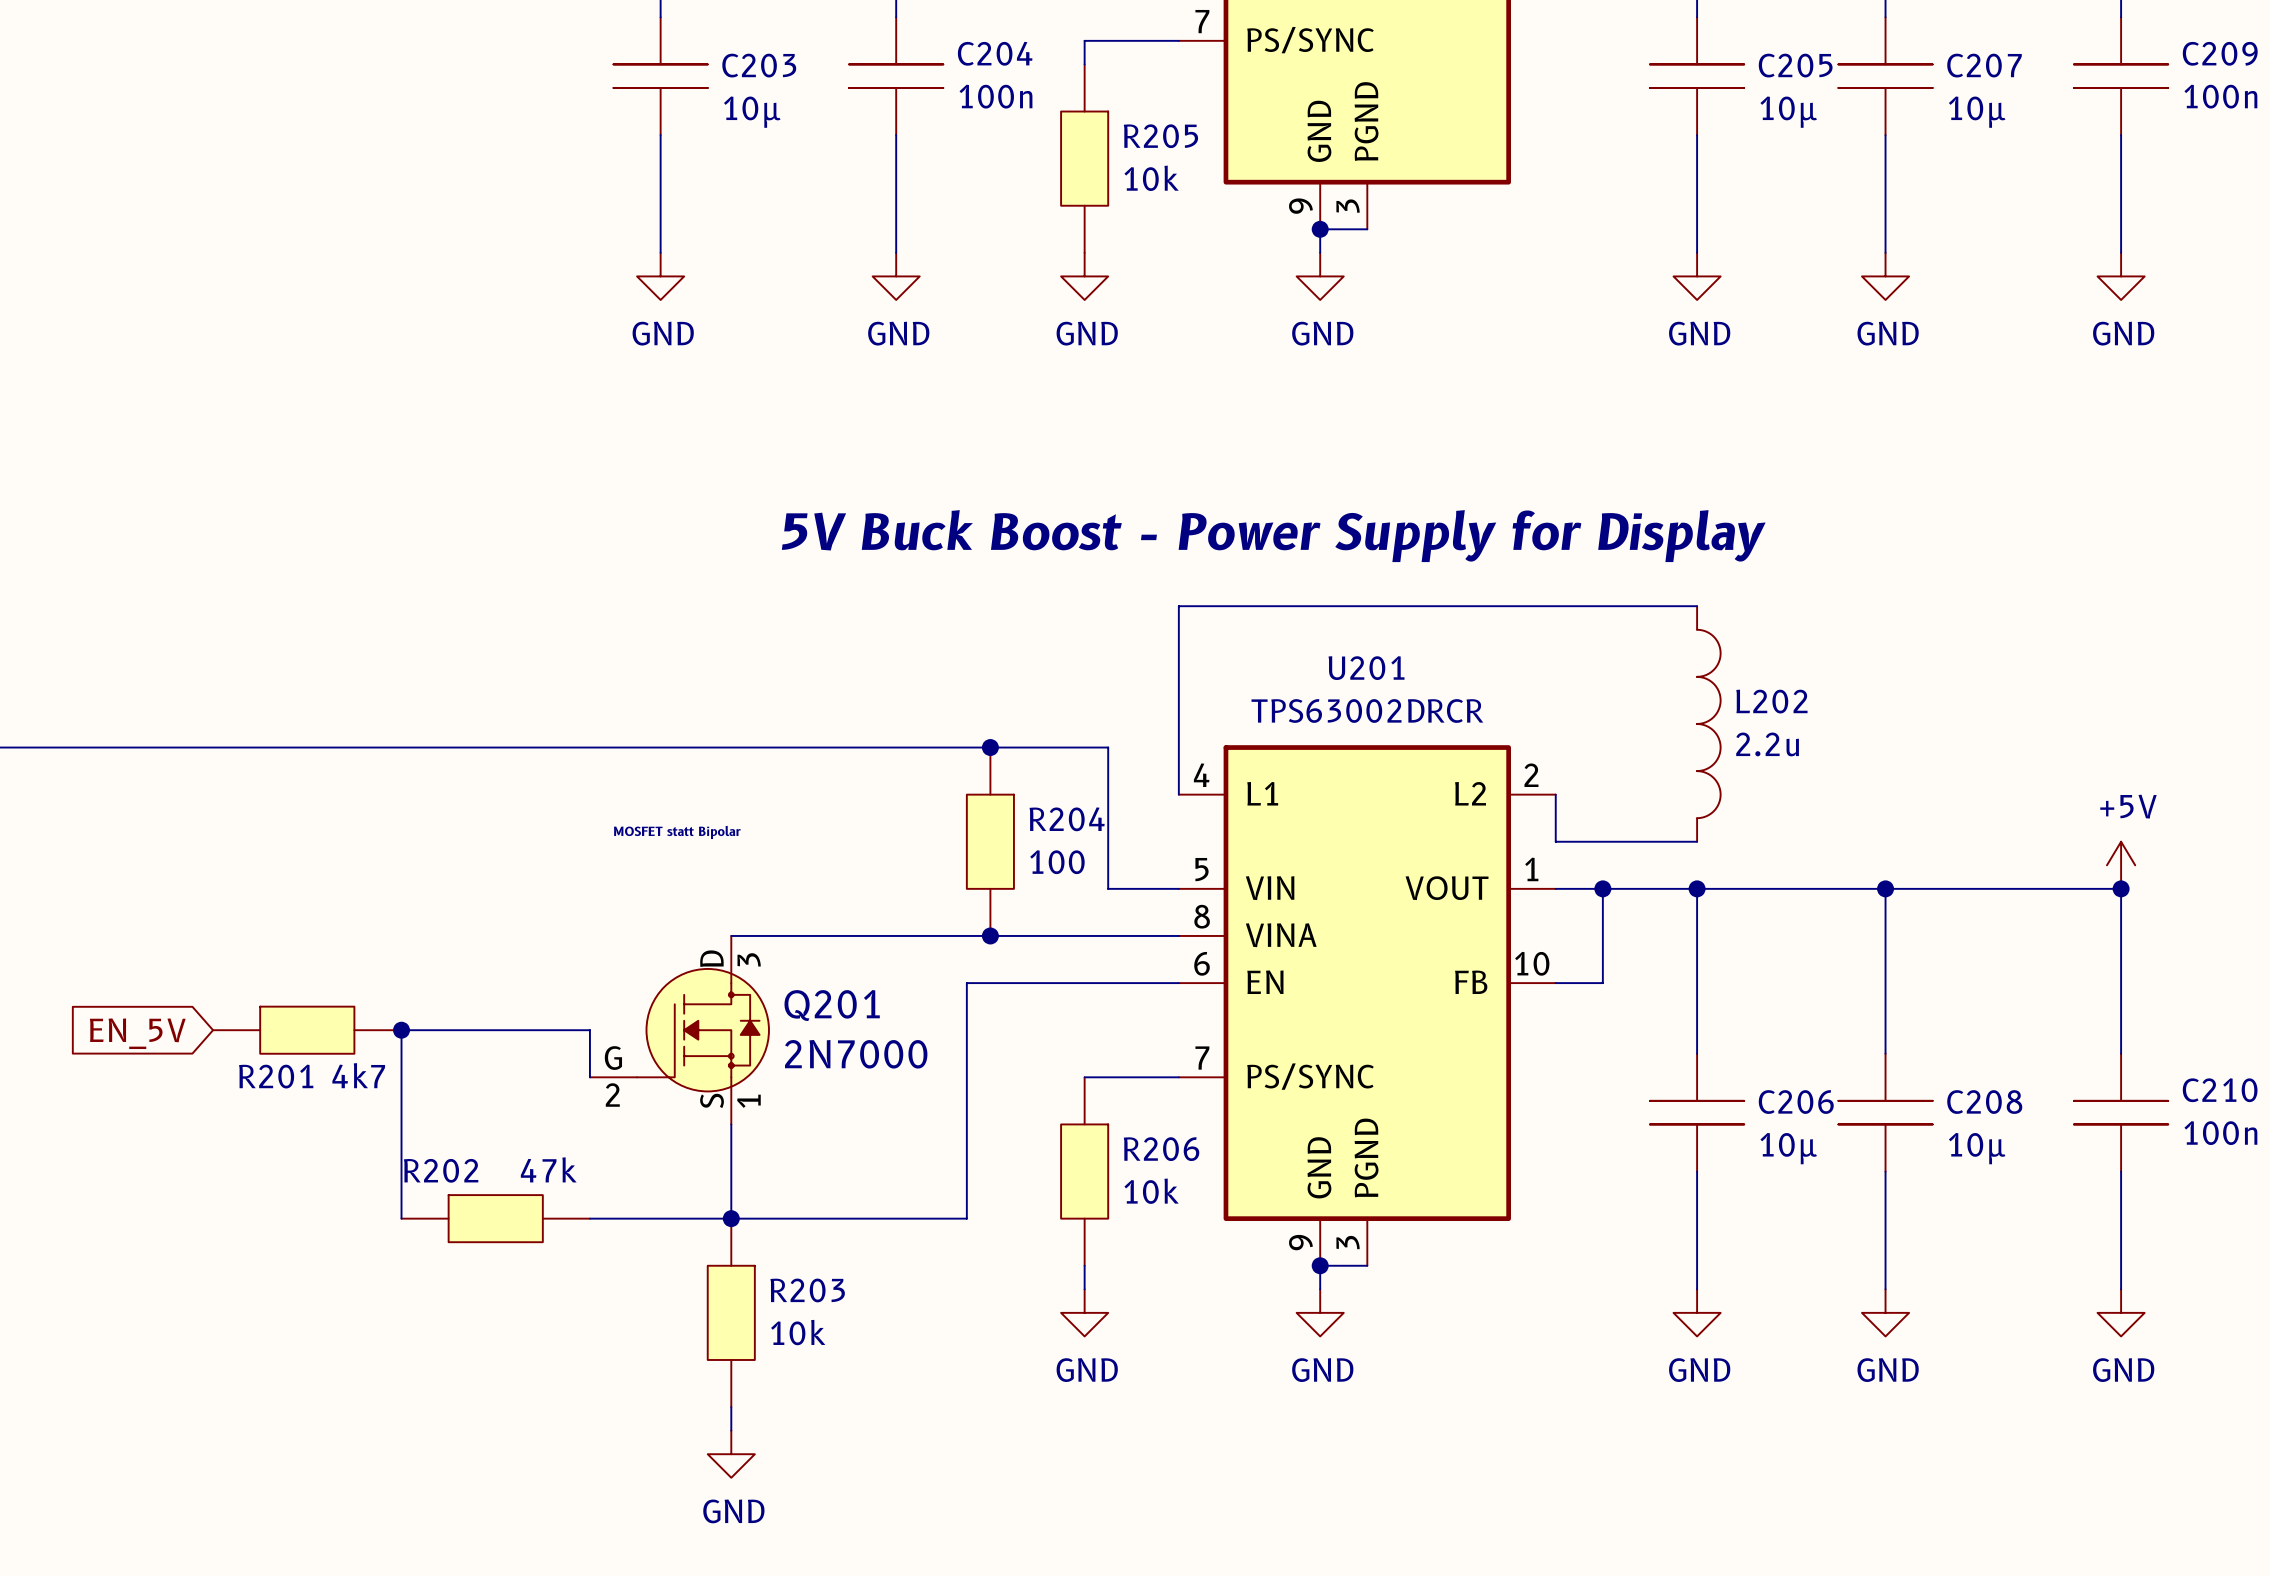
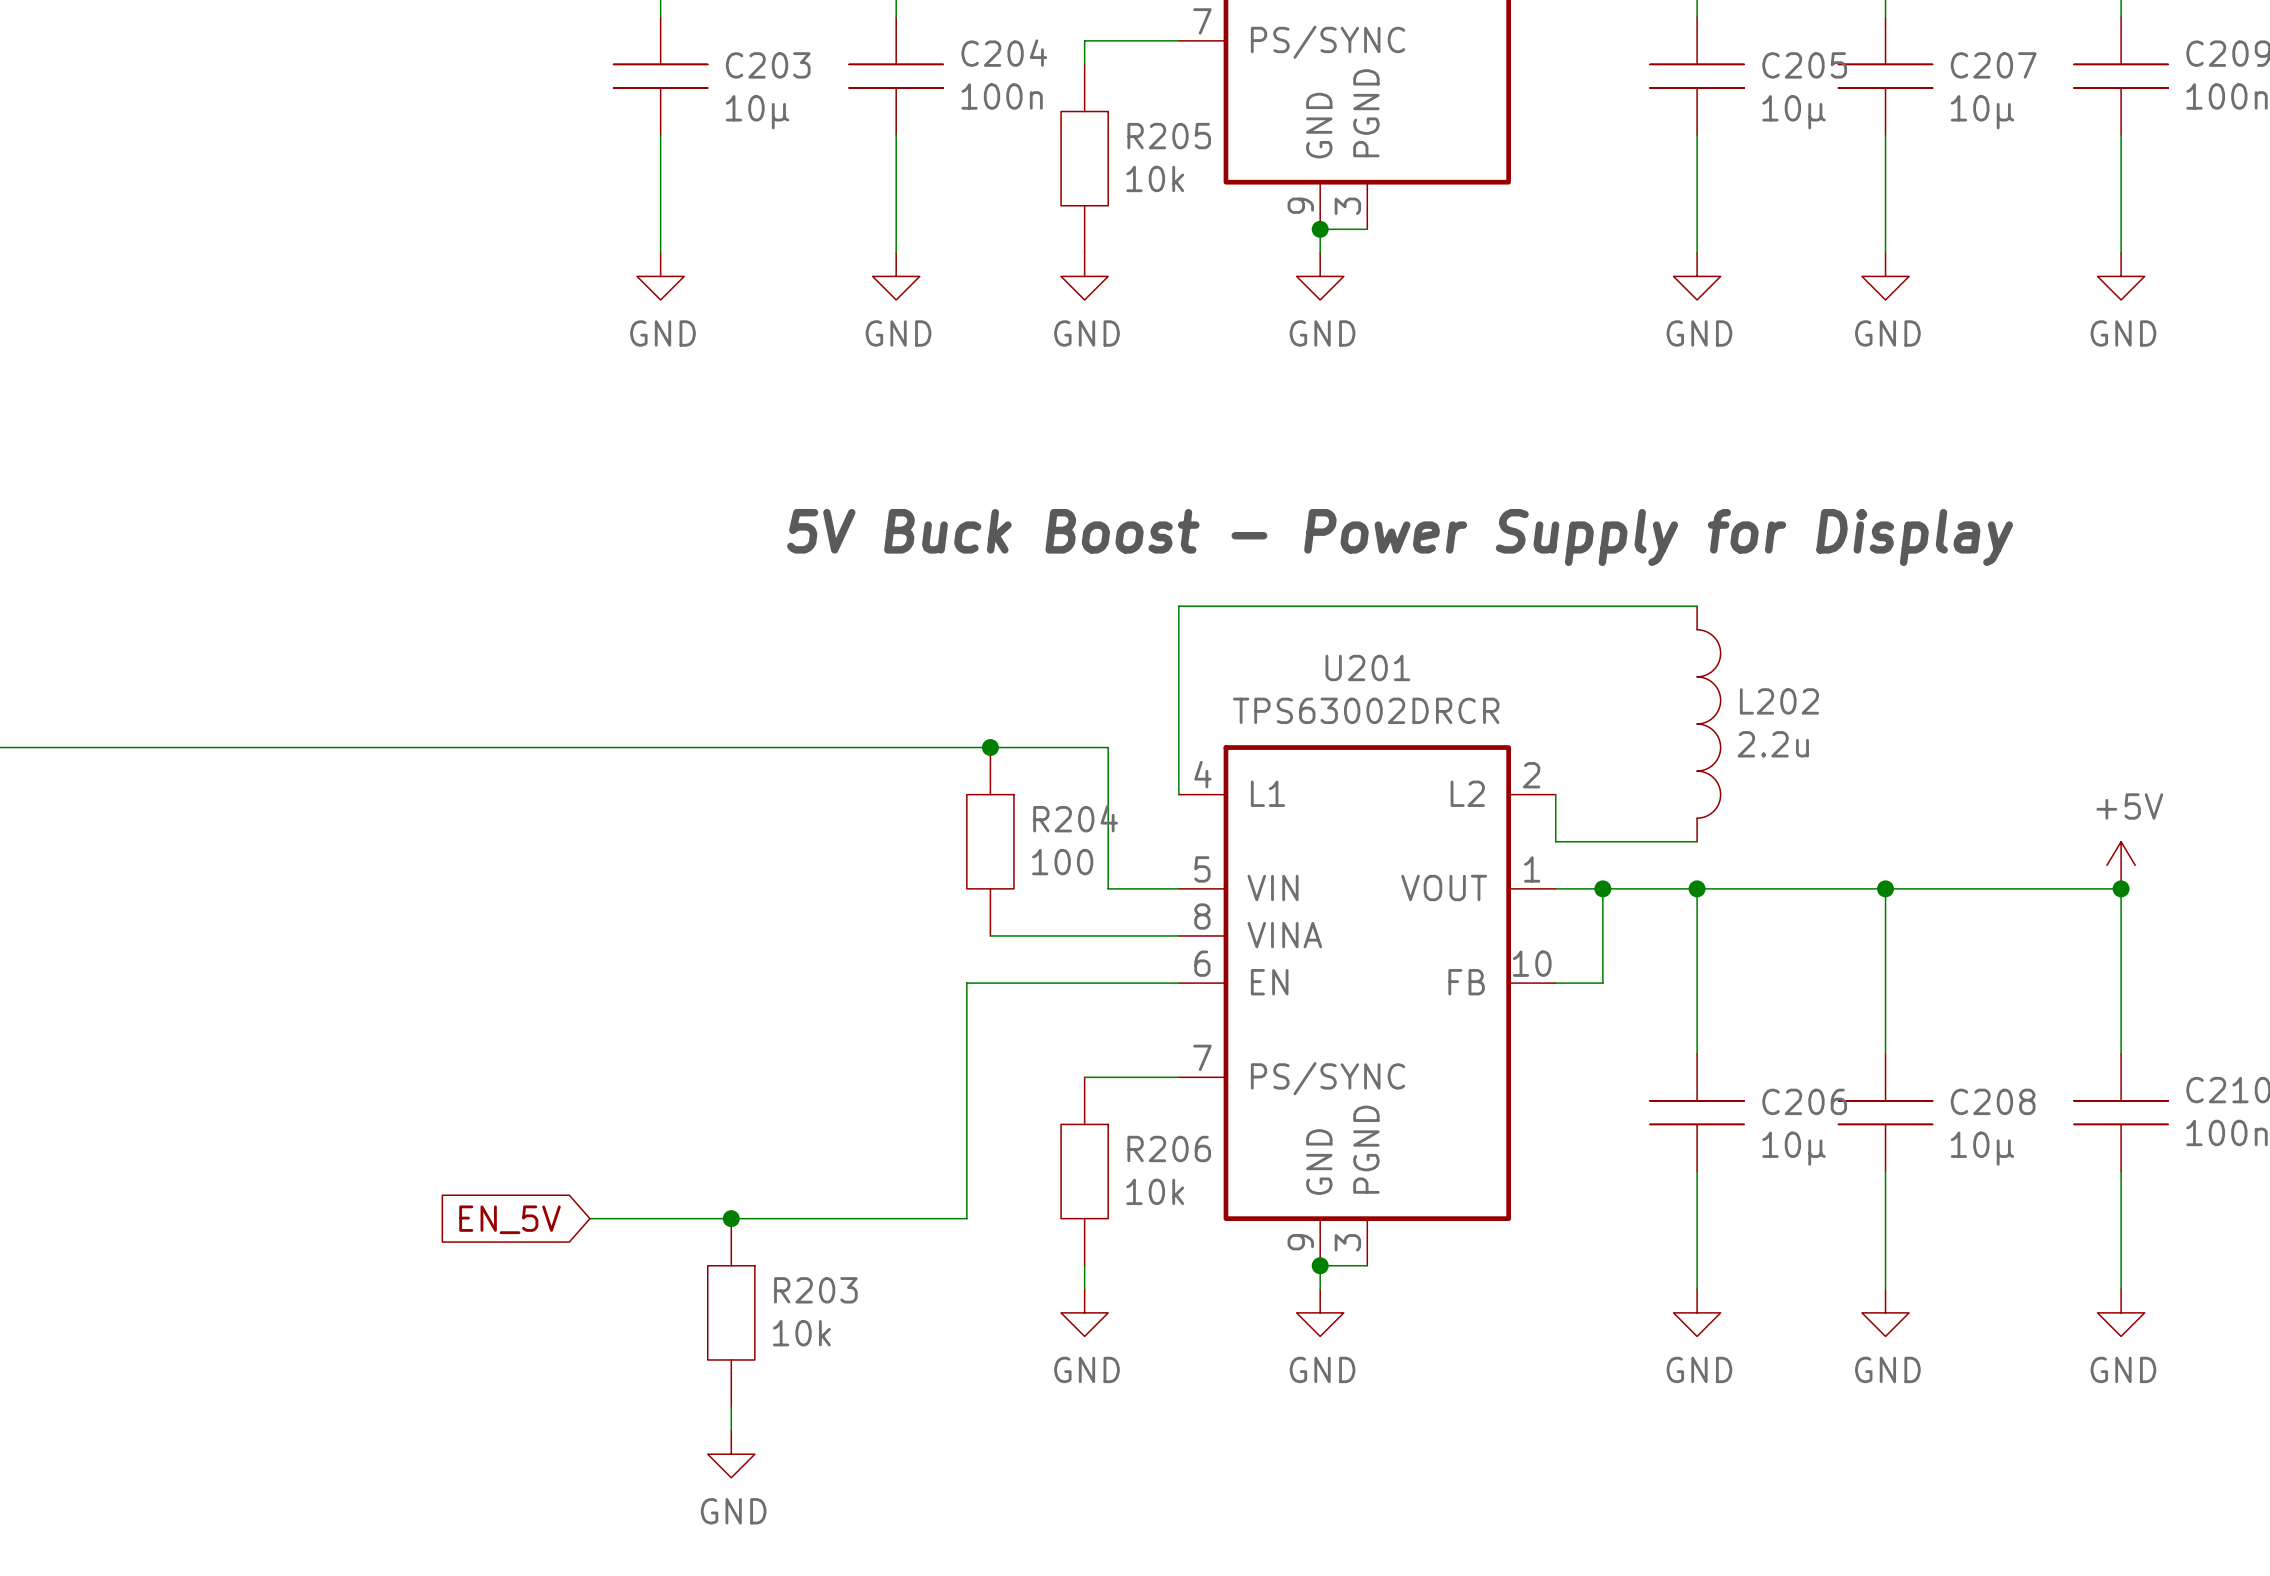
text: MOSFET statt Bipolar (677, 832) -> none
wire: (731, 935) (990, 935) -> none
junction: (990, 935) -> none
R201: 4k7 (307, 1030) -> none
junction: (401, 1030) -> none
Q201: 2N7000 (679, 1030) -> none
global label position: EN_5V (137, 1033) -> EN_5V (510, 1219)
wire: (589, 1077) (589, 1030) (401, 1030) (401, 1218) -> none
wire: (731, 1124) (731, 1218) -> none
R202: 47k (495, 1218) -> none

